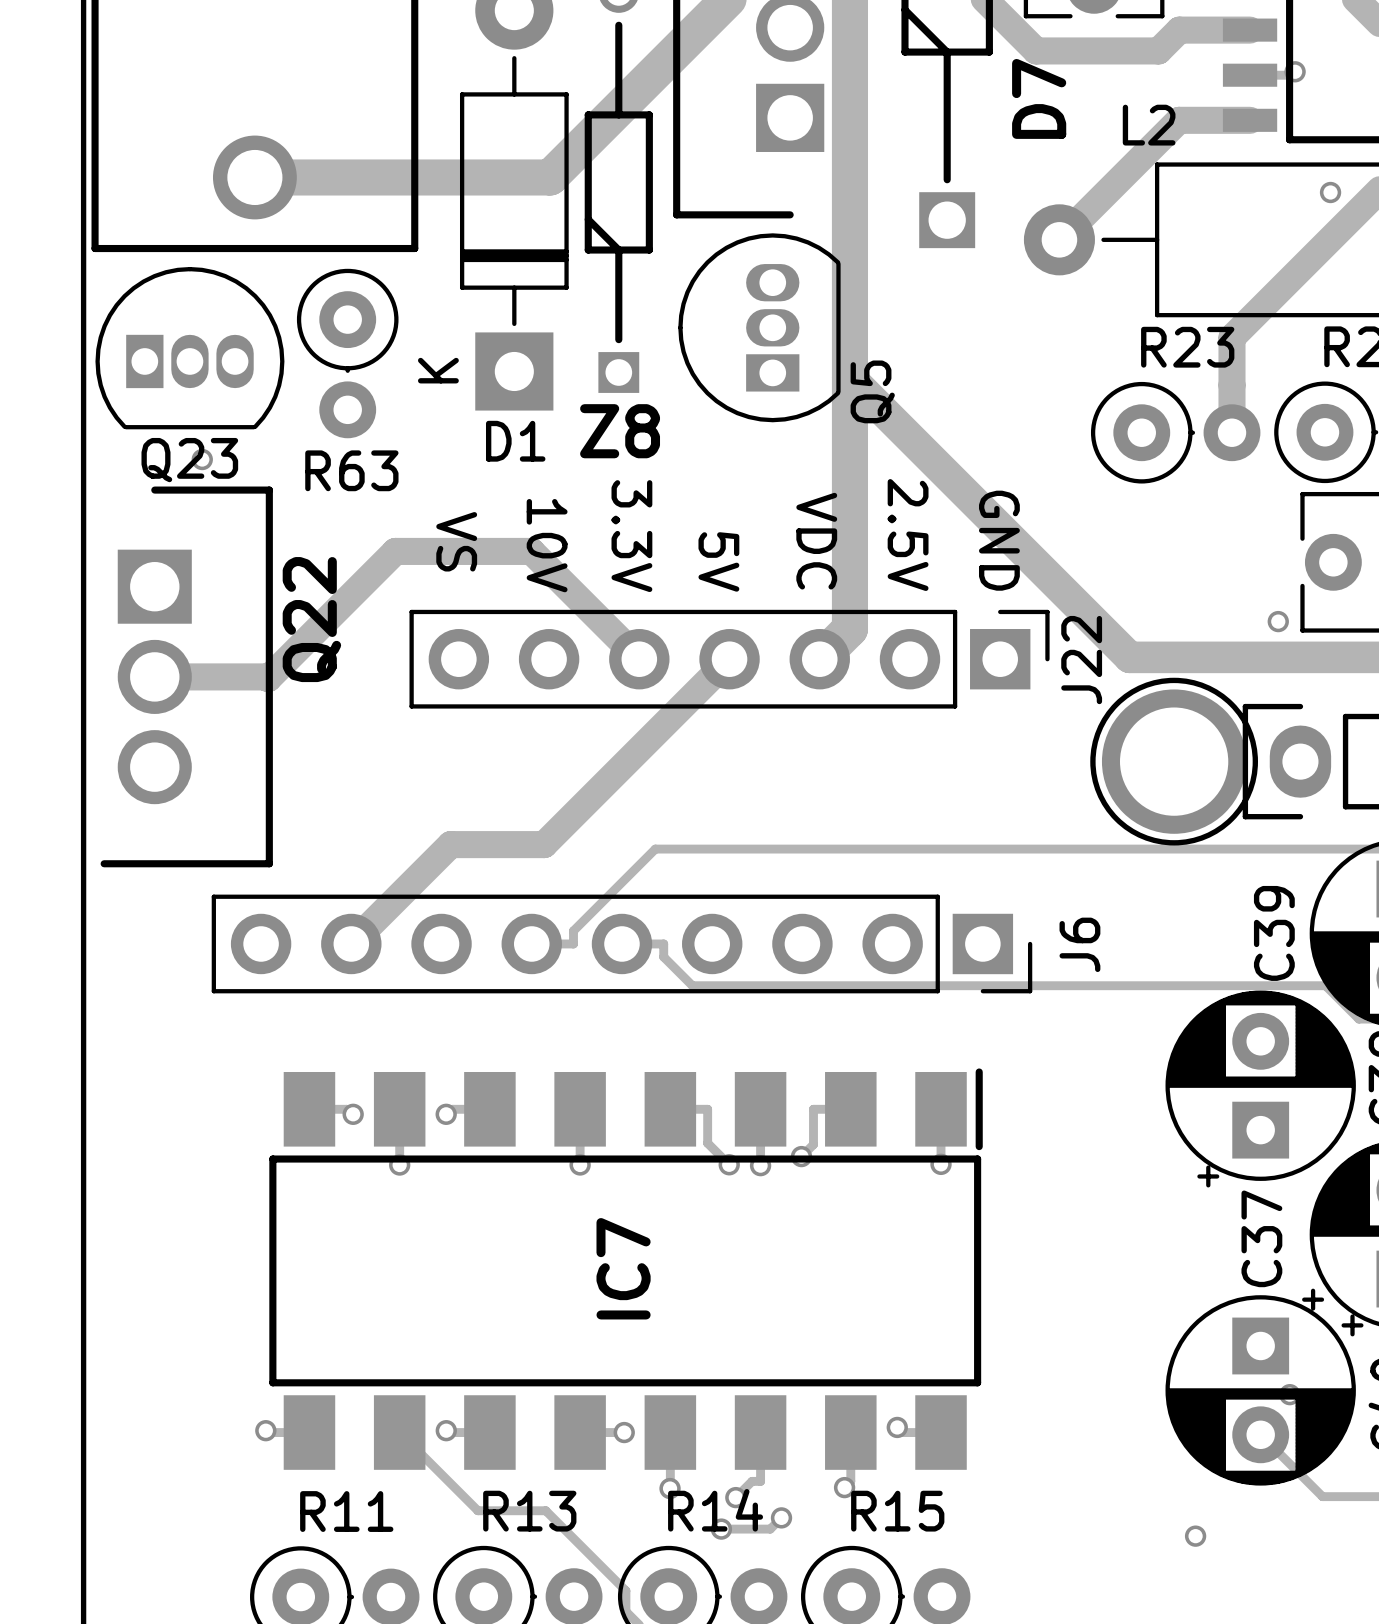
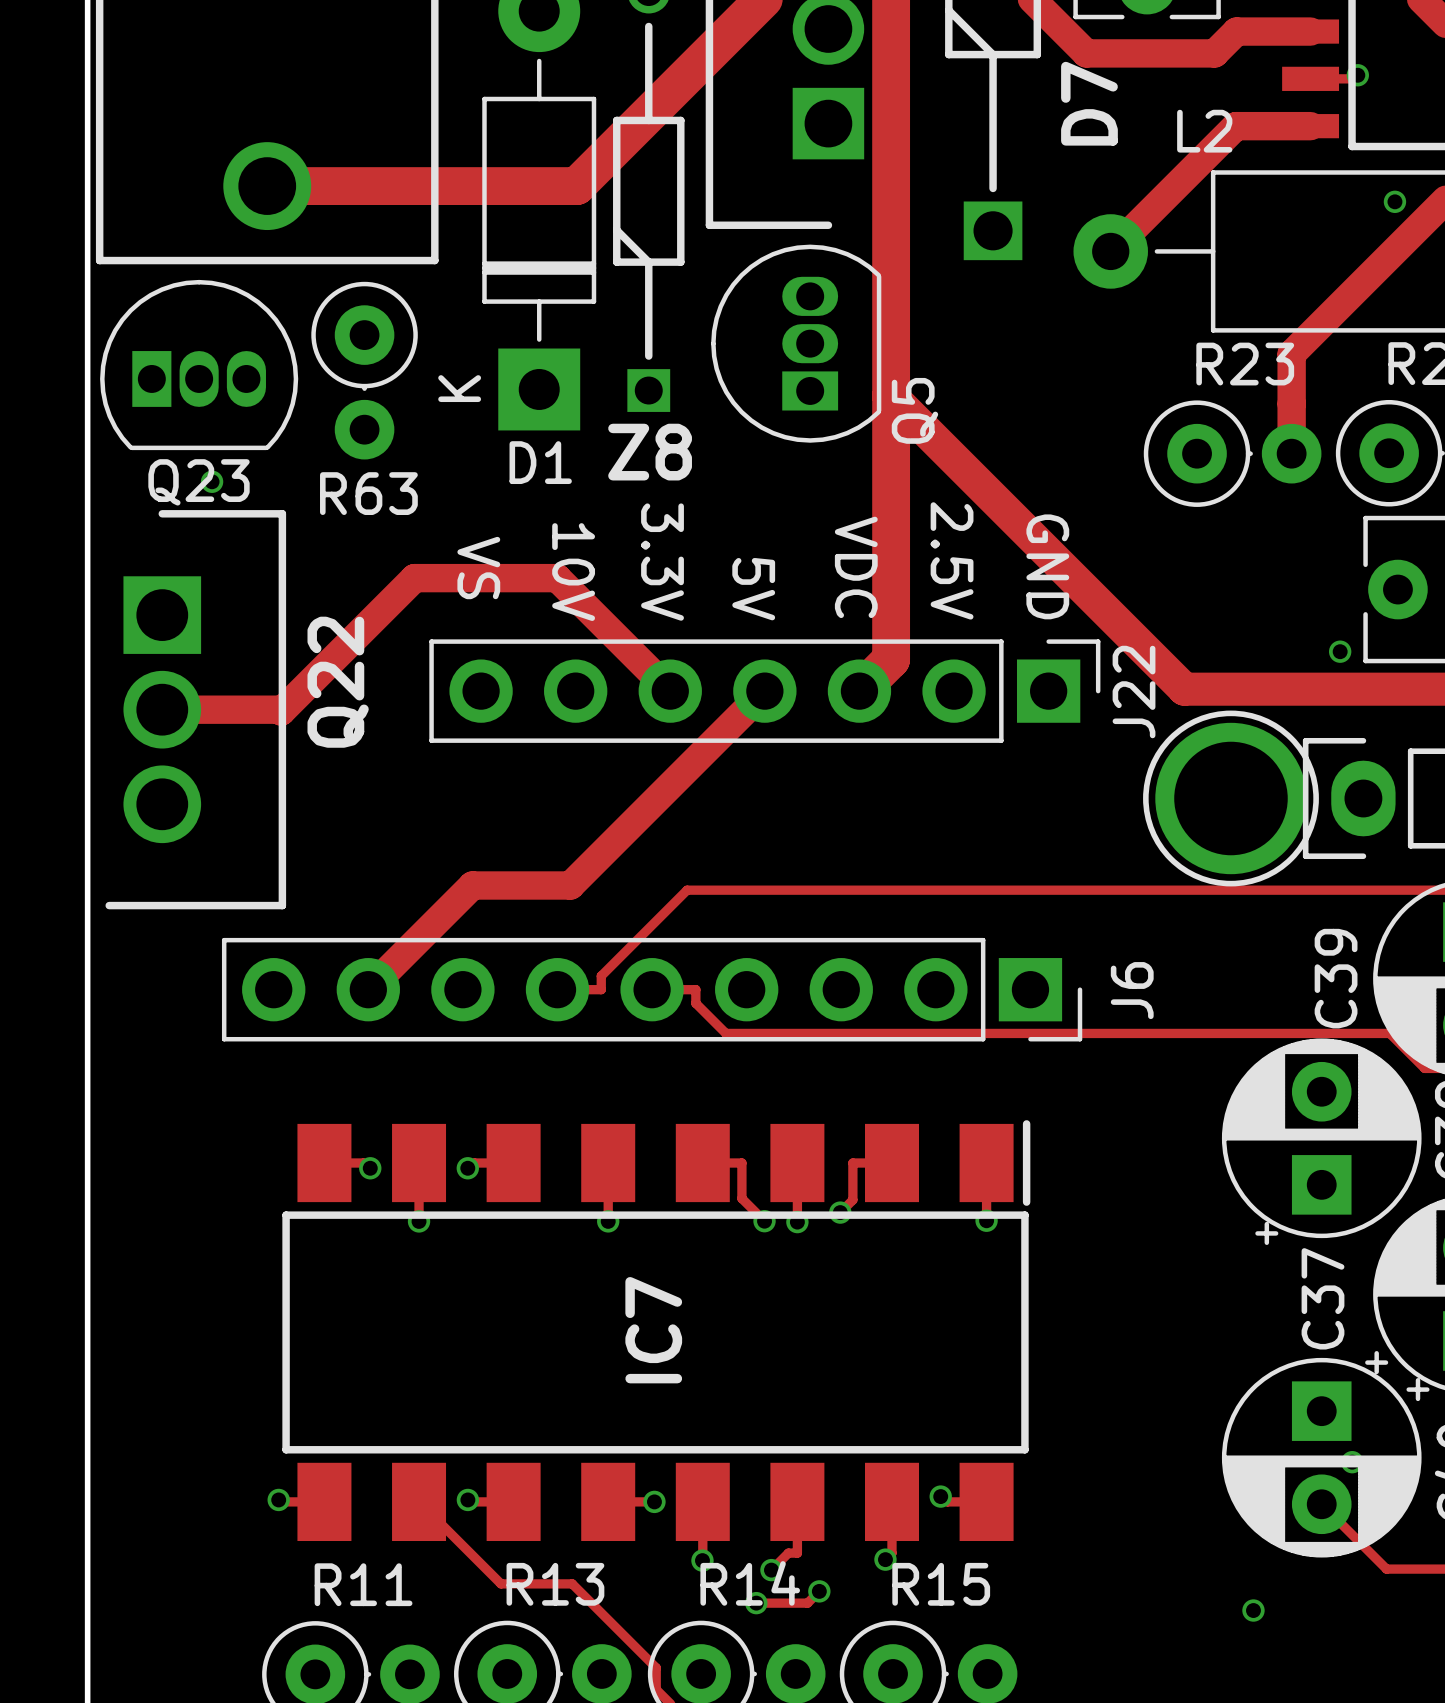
Q22 name position: Q22 (311, 619) -> Q22 (338, 682)

